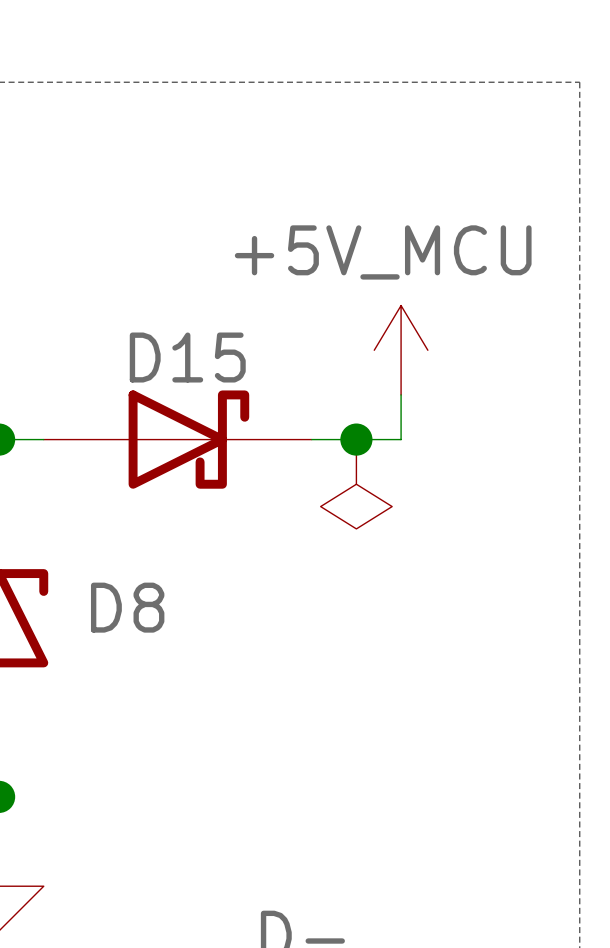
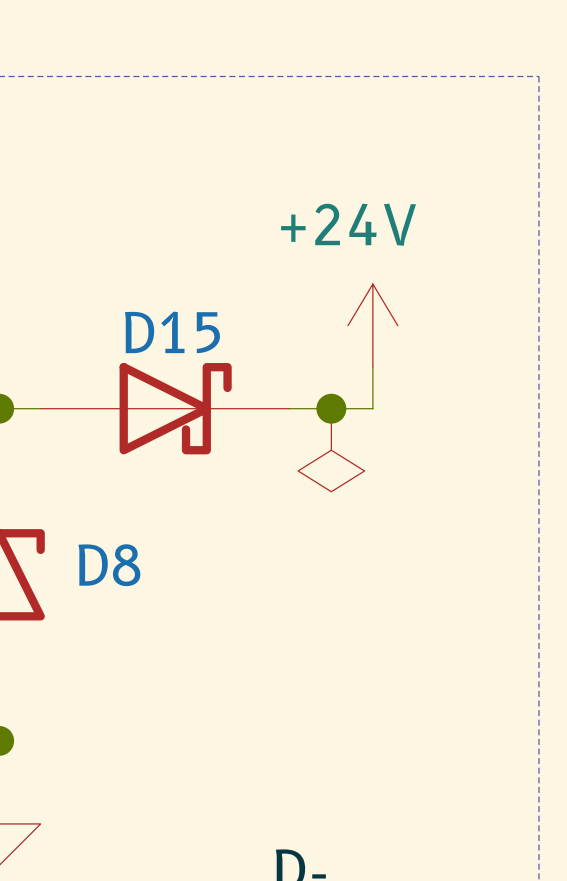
power symbol: +5V_MCU (401, 350) -> +24V (372, 325)

